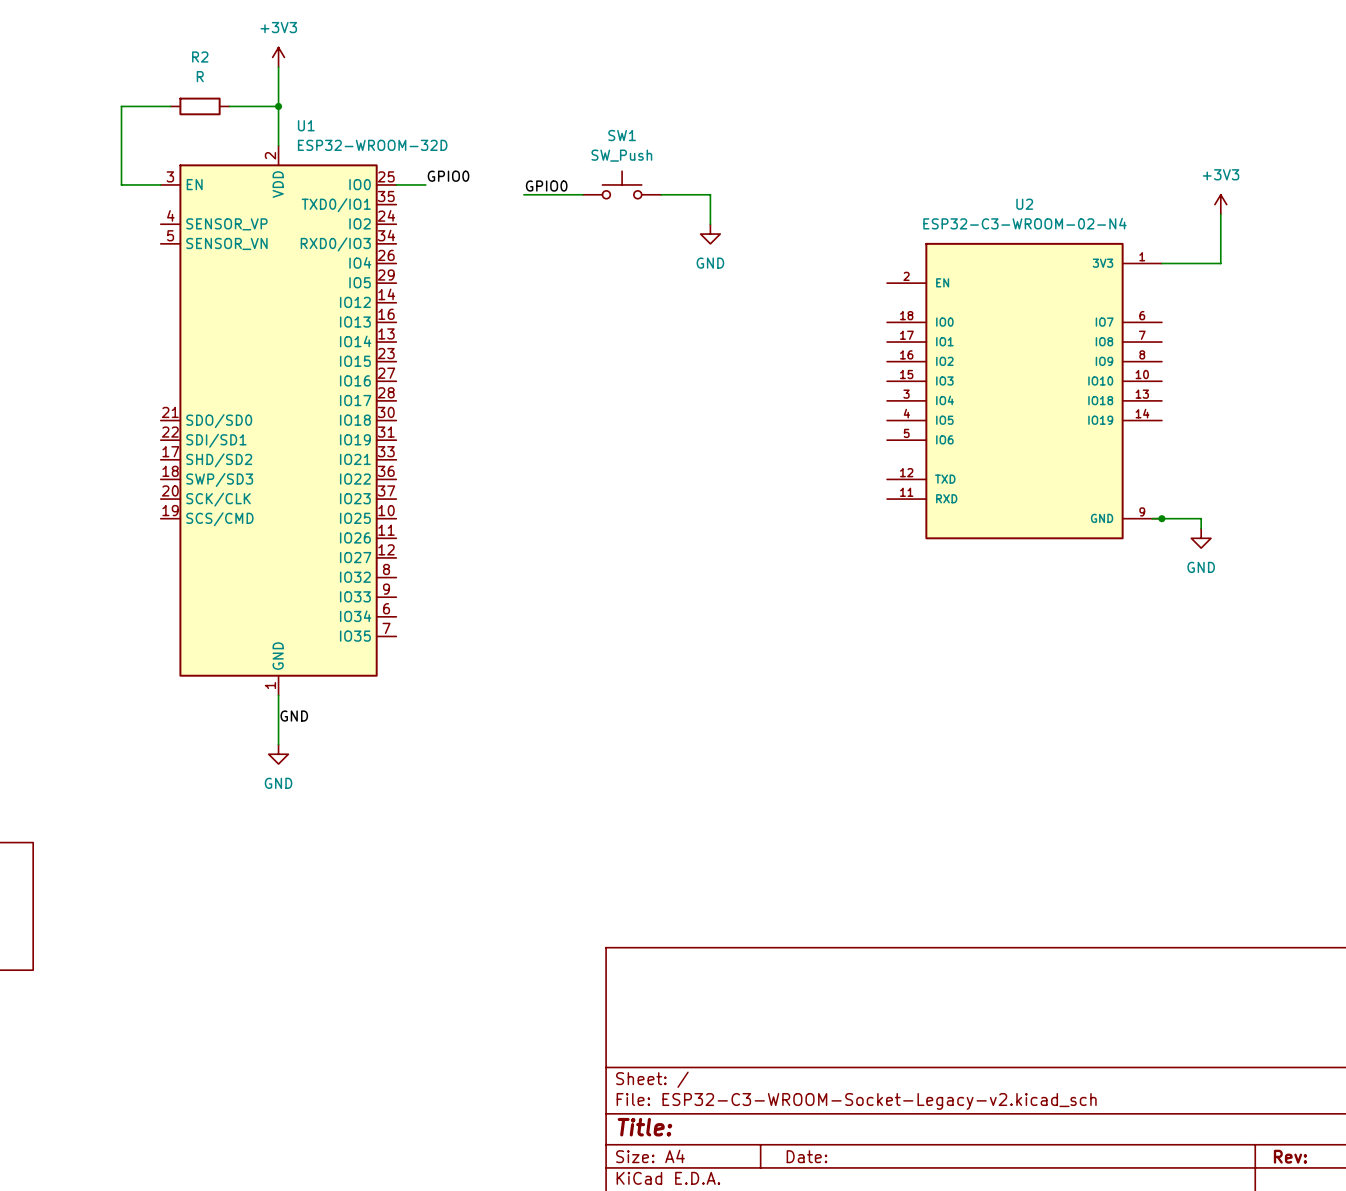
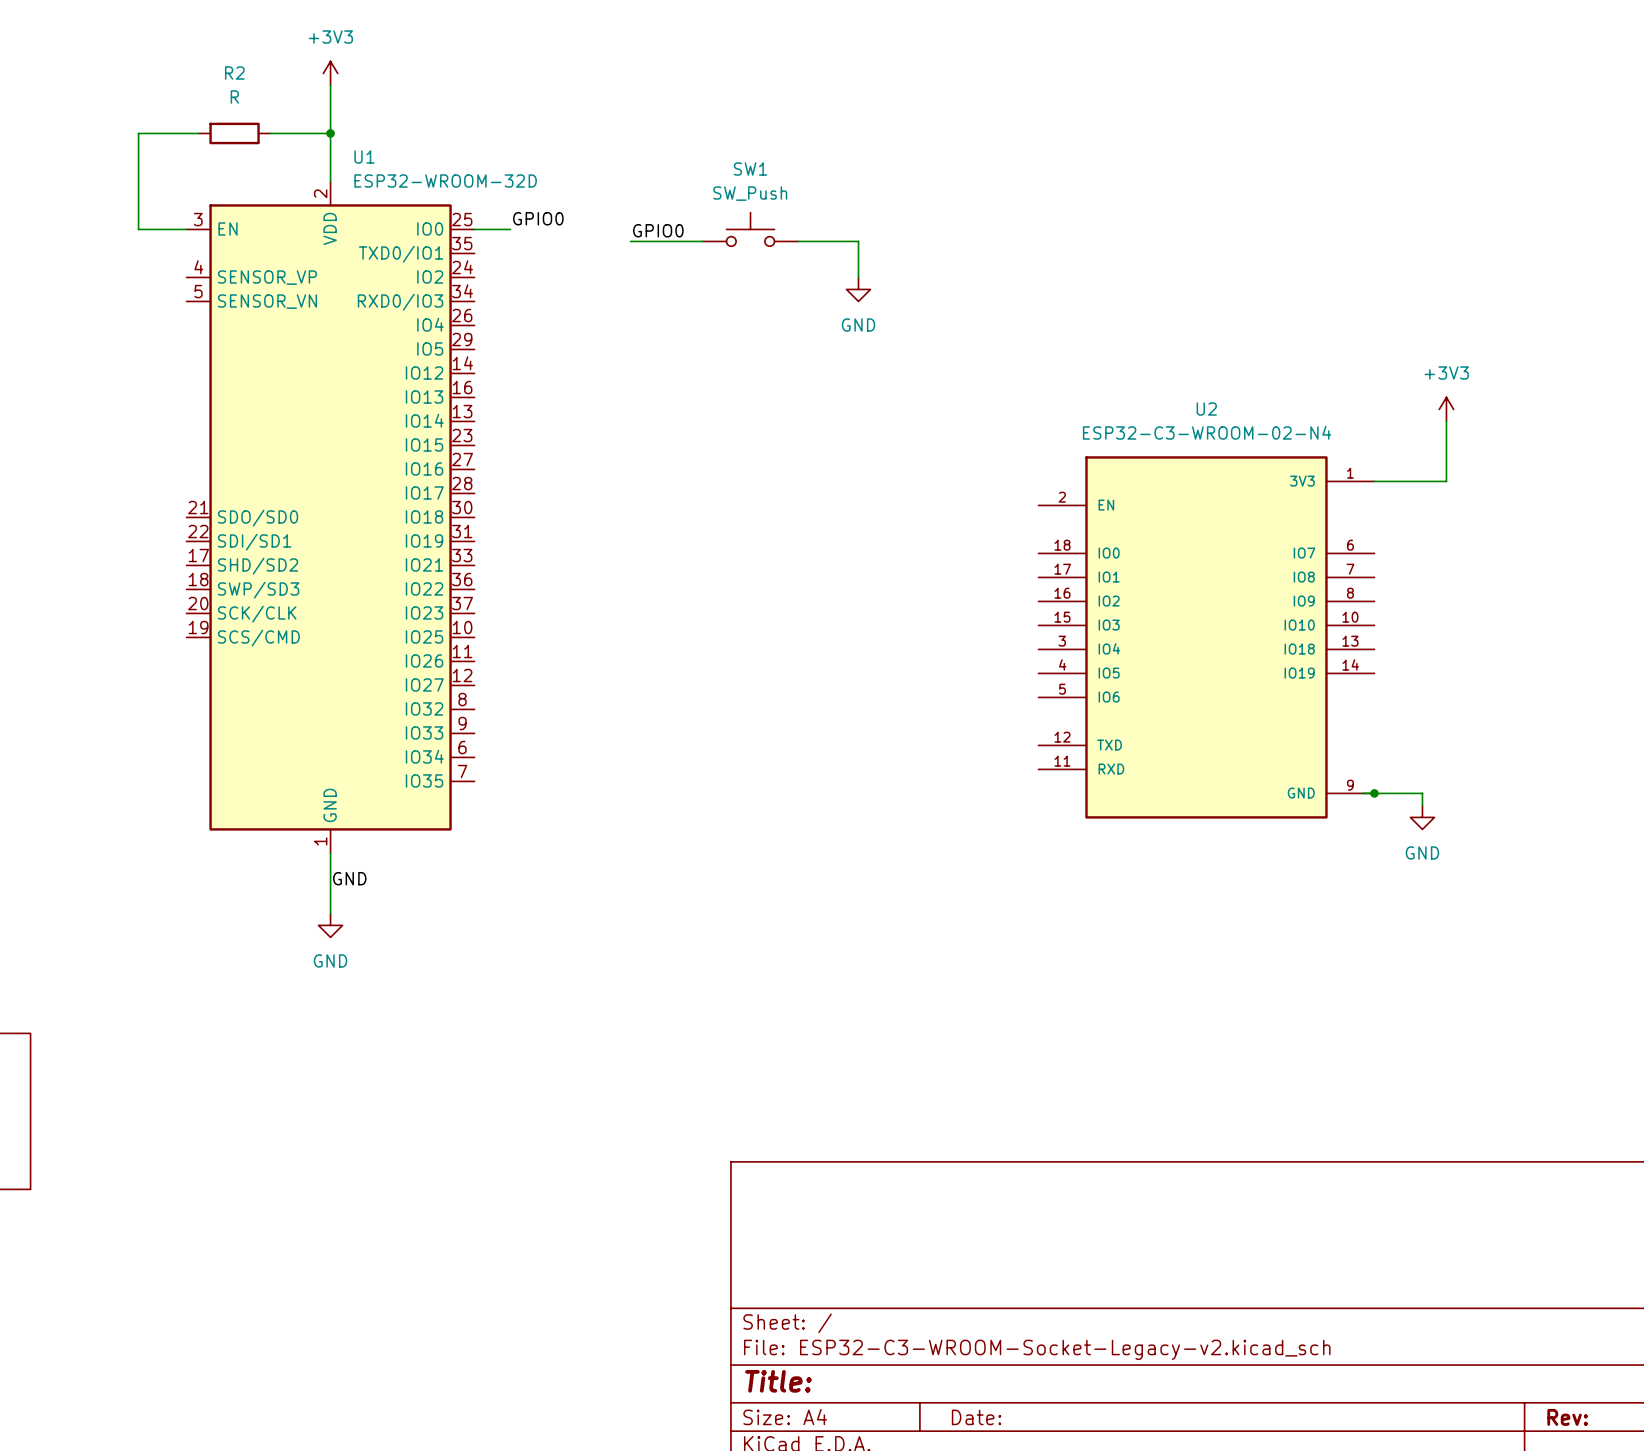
power symbol position: +3V3 (1220, 204) -> +3V3 (1446, 409)
wire: (1220, 214) (1220, 263) (1161, 263) -> (1446, 421) (1446, 481) (1374, 481)
U2 position: (1024, 391) -> (1206, 637)
wire: (1152, 518) (1201, 518) (1201, 528) -> (1362, 793) (1422, 793) (1422, 805)
junction: (1161, 518) -> none
power symbol position: GND (1201, 538) -> GND (1422, 817)
junction: none -> (1374, 793)

